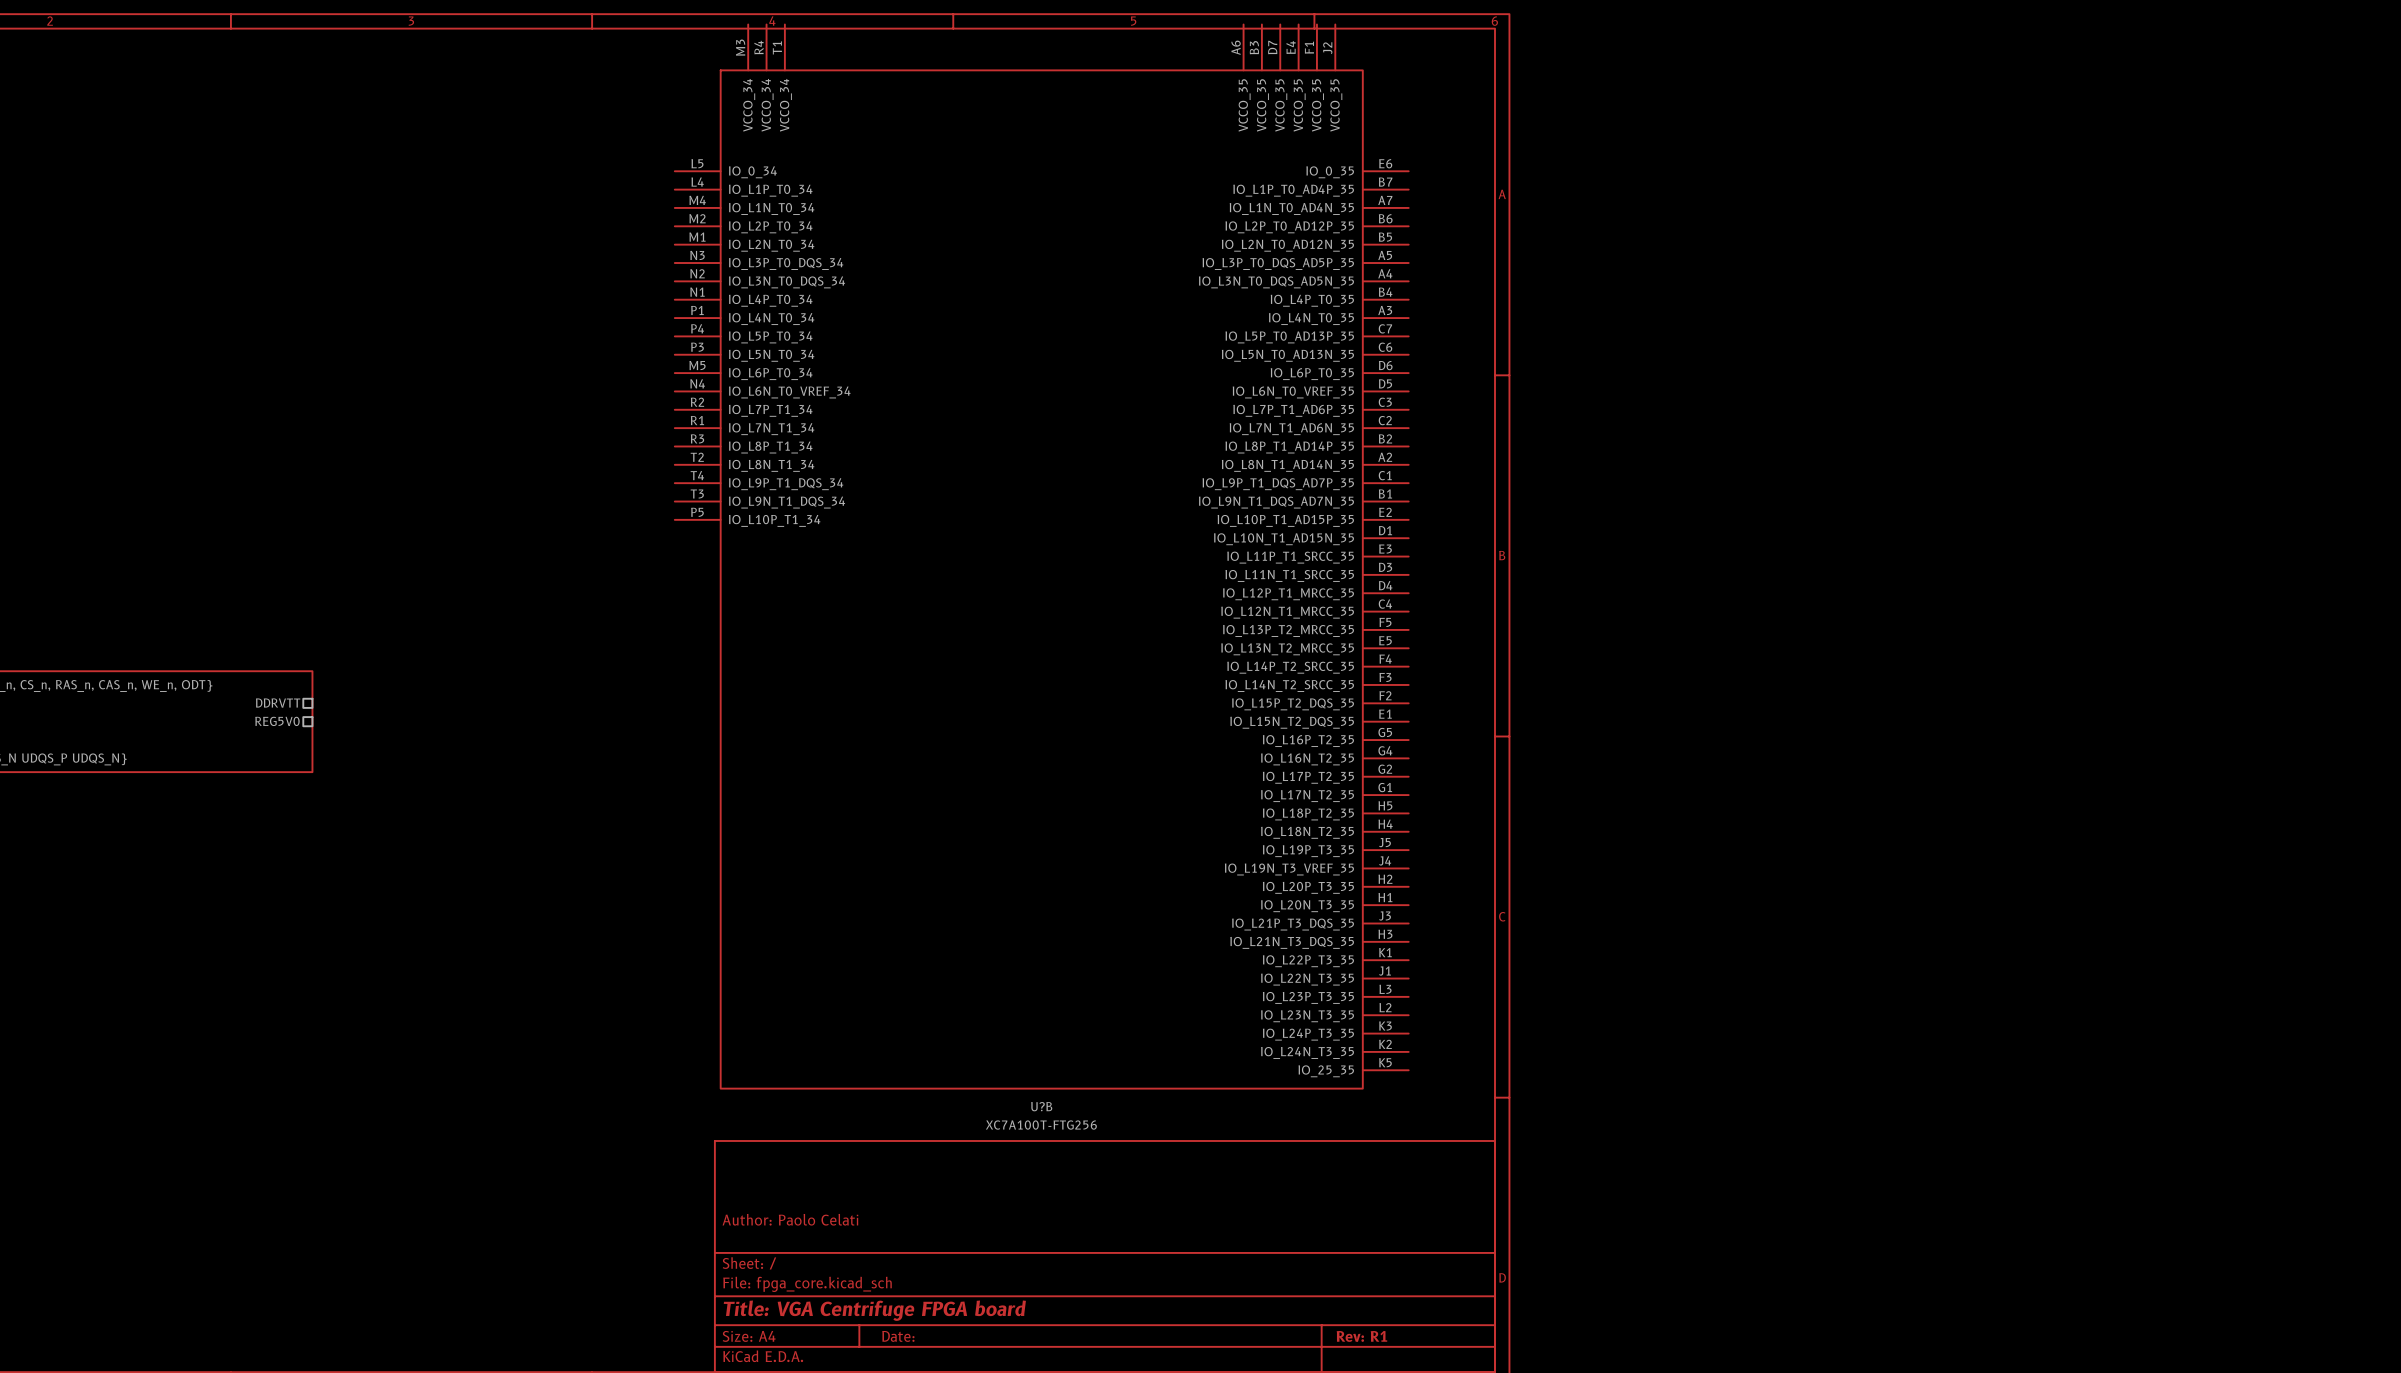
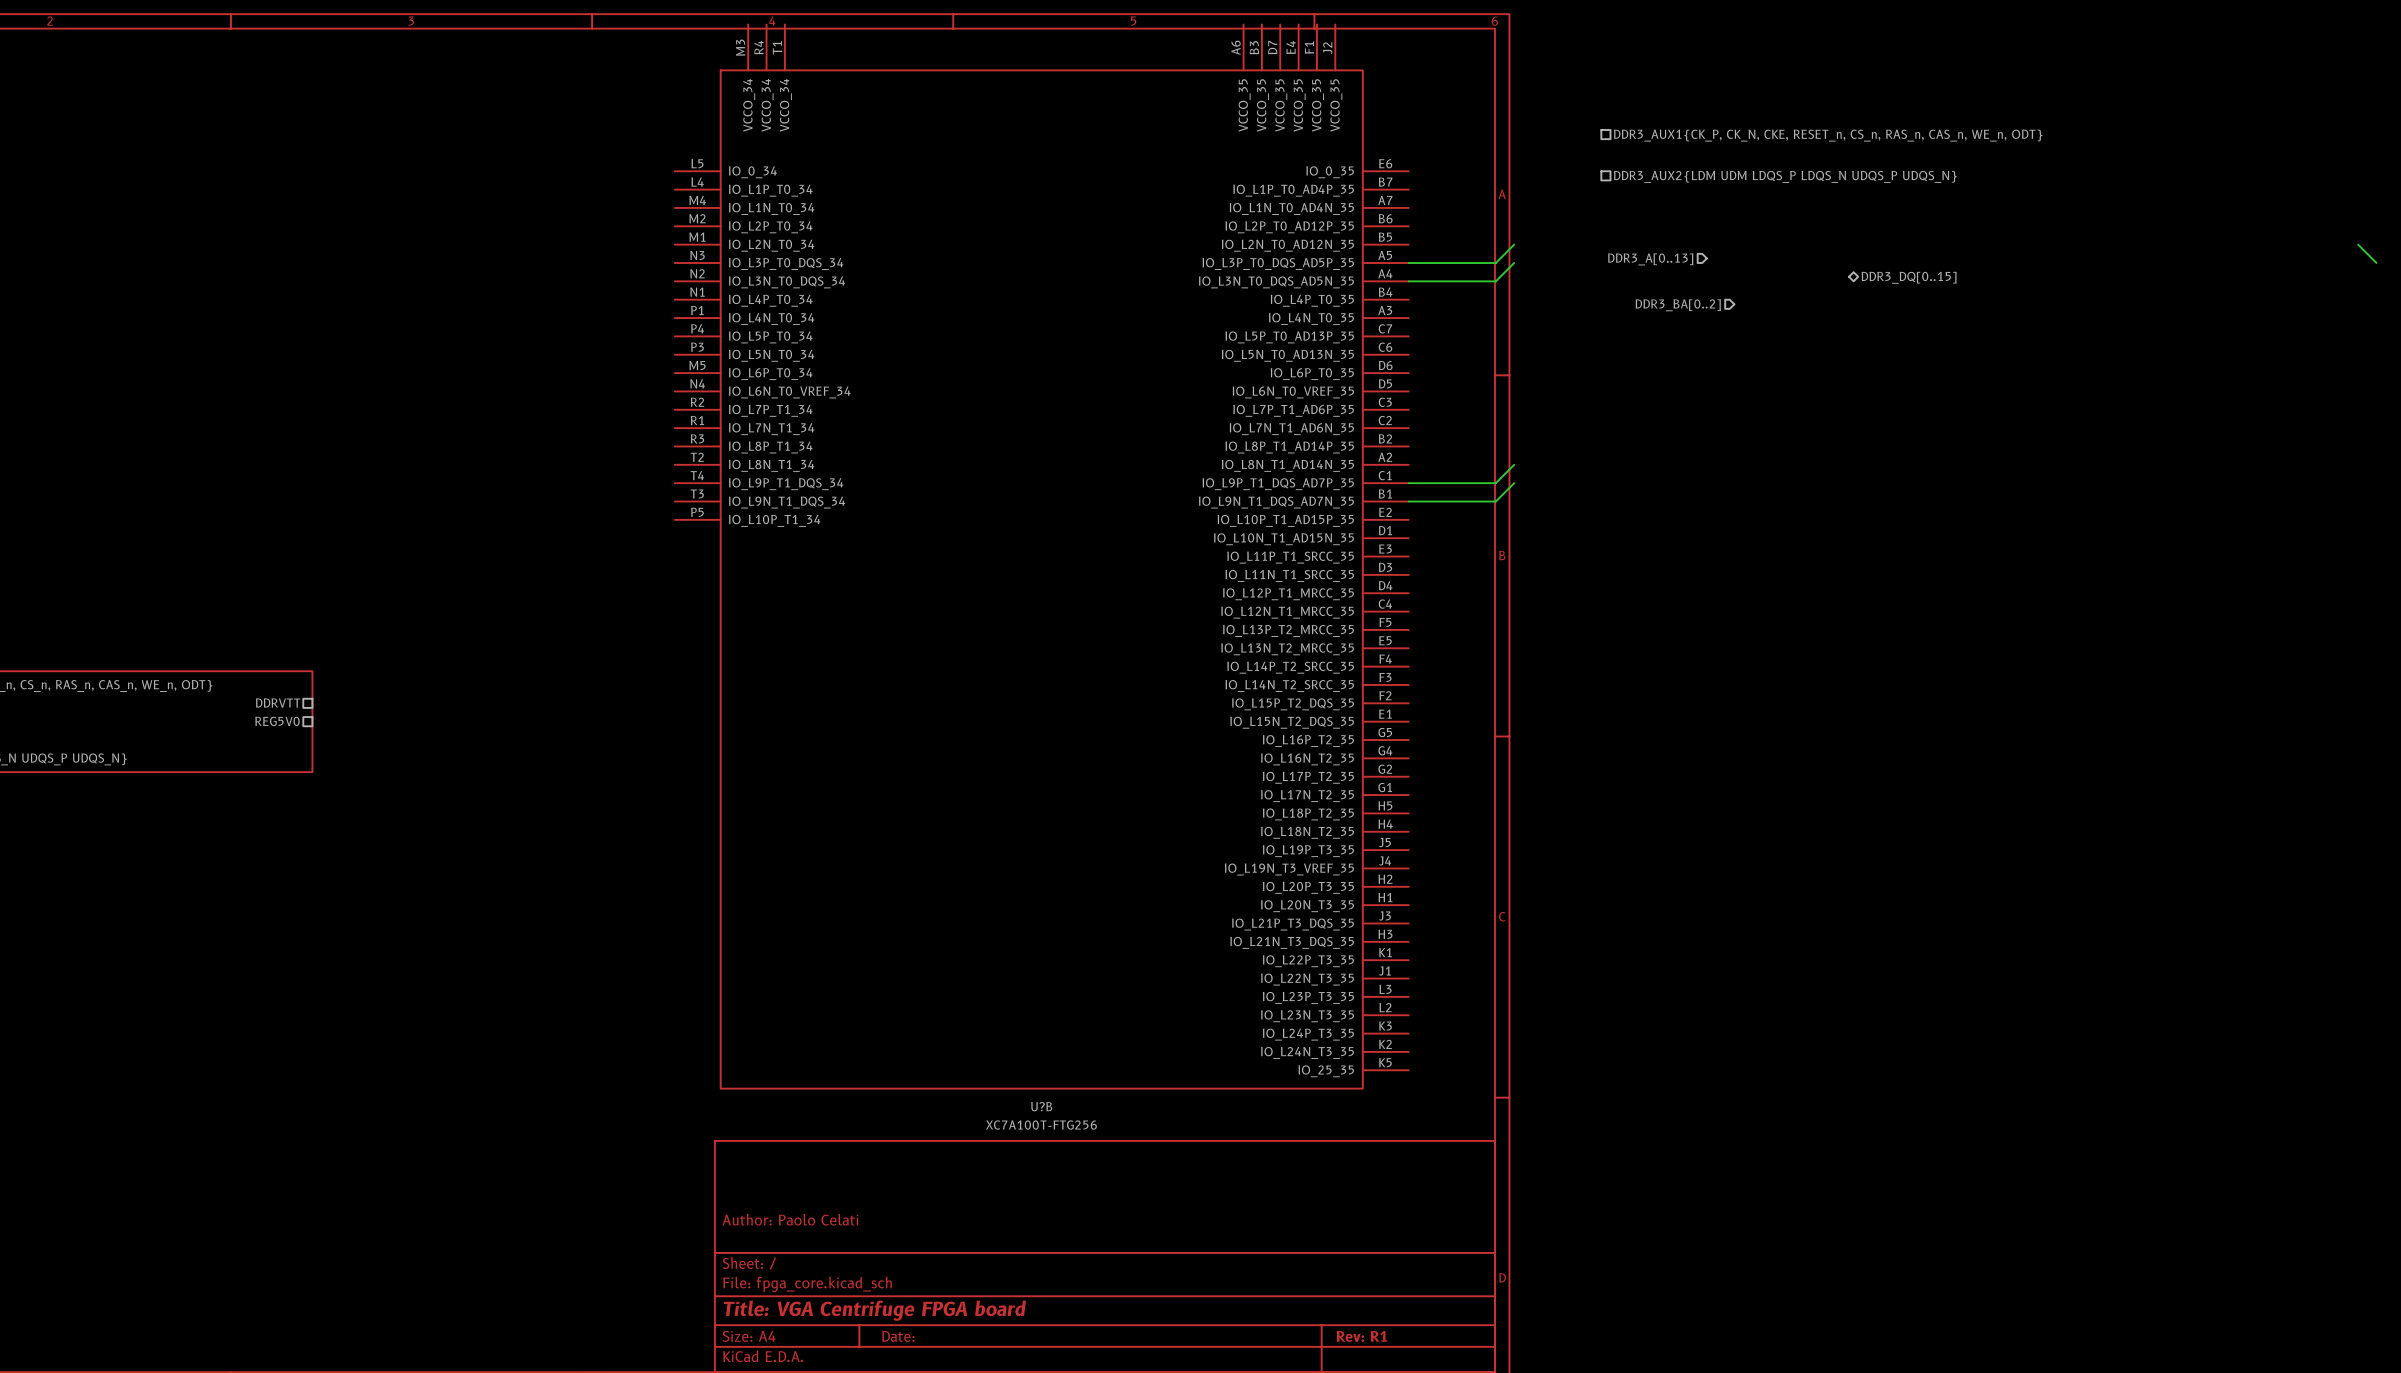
hierarchical label: none -> DDR3_AUX1{CK_P, CK_N, CKE, RESET_n, CS_n, RAS_n, CAS_n, WE_n, ODT} (1828, 135)
hierarchical label: none -> DDR3_AUX2{LDM UDM LDQS_P LDQS_N UDQS_P UDQS_N} (1785, 176)
wire: none -> (1514, 244) (1495, 263) (1408, 263)
wire: none -> (2358, 244) (2376, 263)
hierarchical label: none -> DDR3_A[0..13] (1650, 259)
wire: none -> (1514, 263) (1495, 281) (1408, 281)
hierarchical label: none -> DDR3_DQ[0..15] (1909, 277)
hierarchical label: none -> DDR3_BA[0..2] (1678, 305)
wire: none -> (1514, 464) (1495, 483) (1408, 483)
wire: none -> (1514, 483) (1495, 501) (1408, 501)

